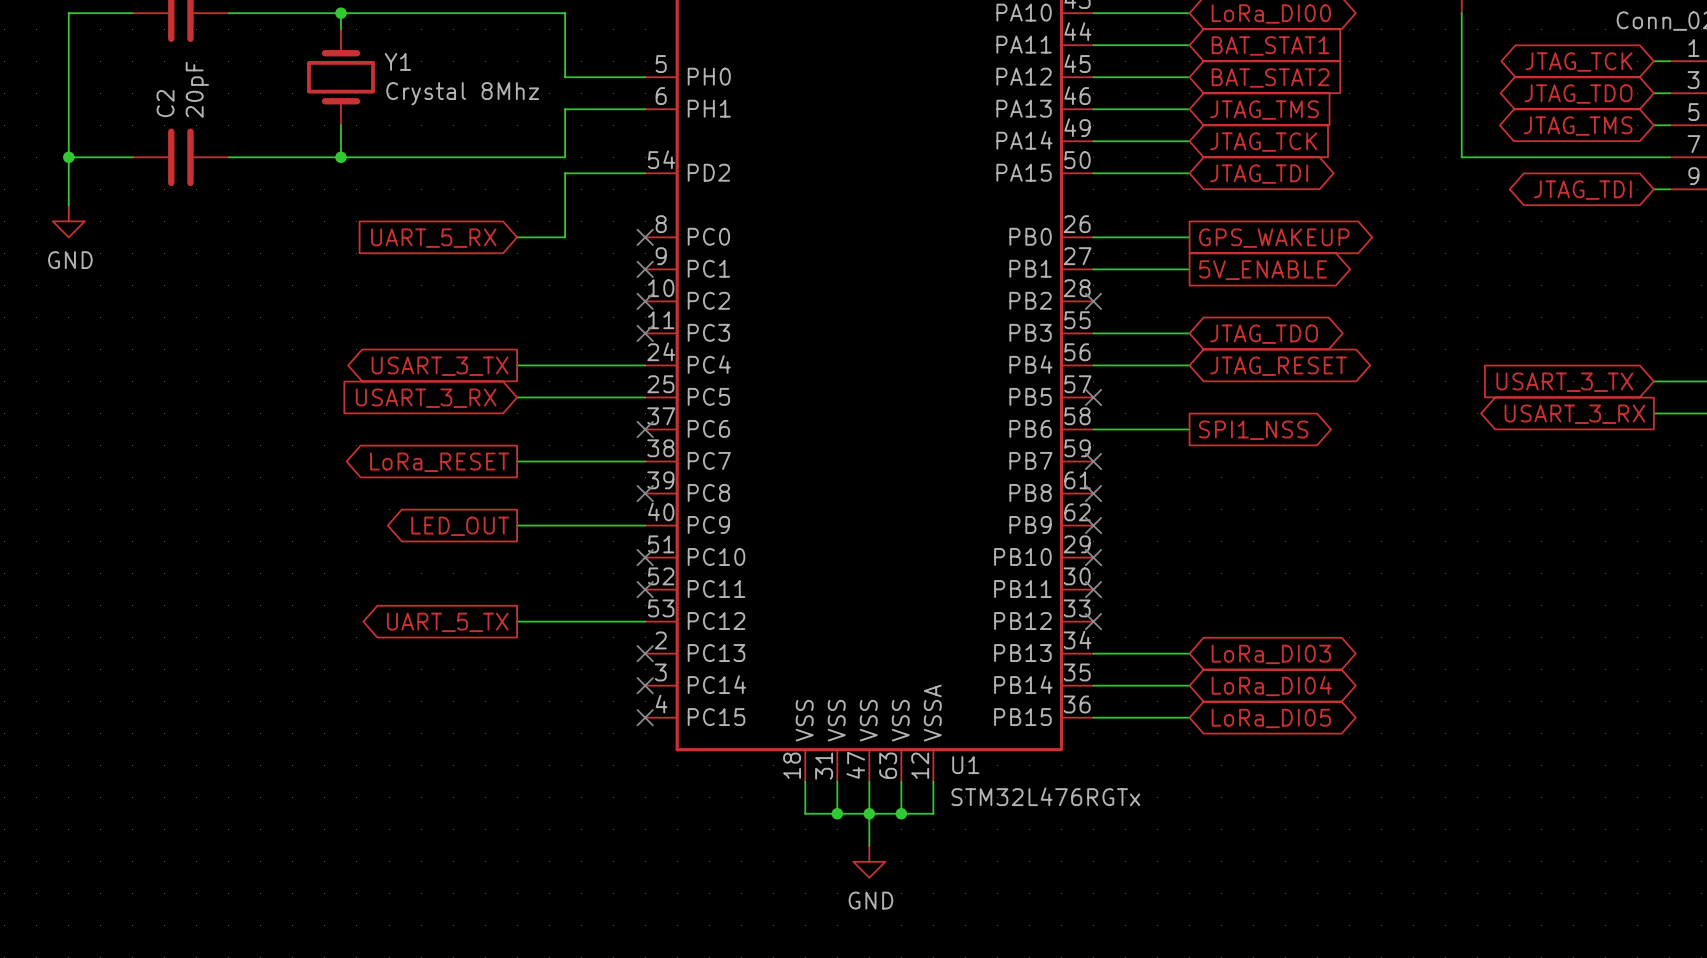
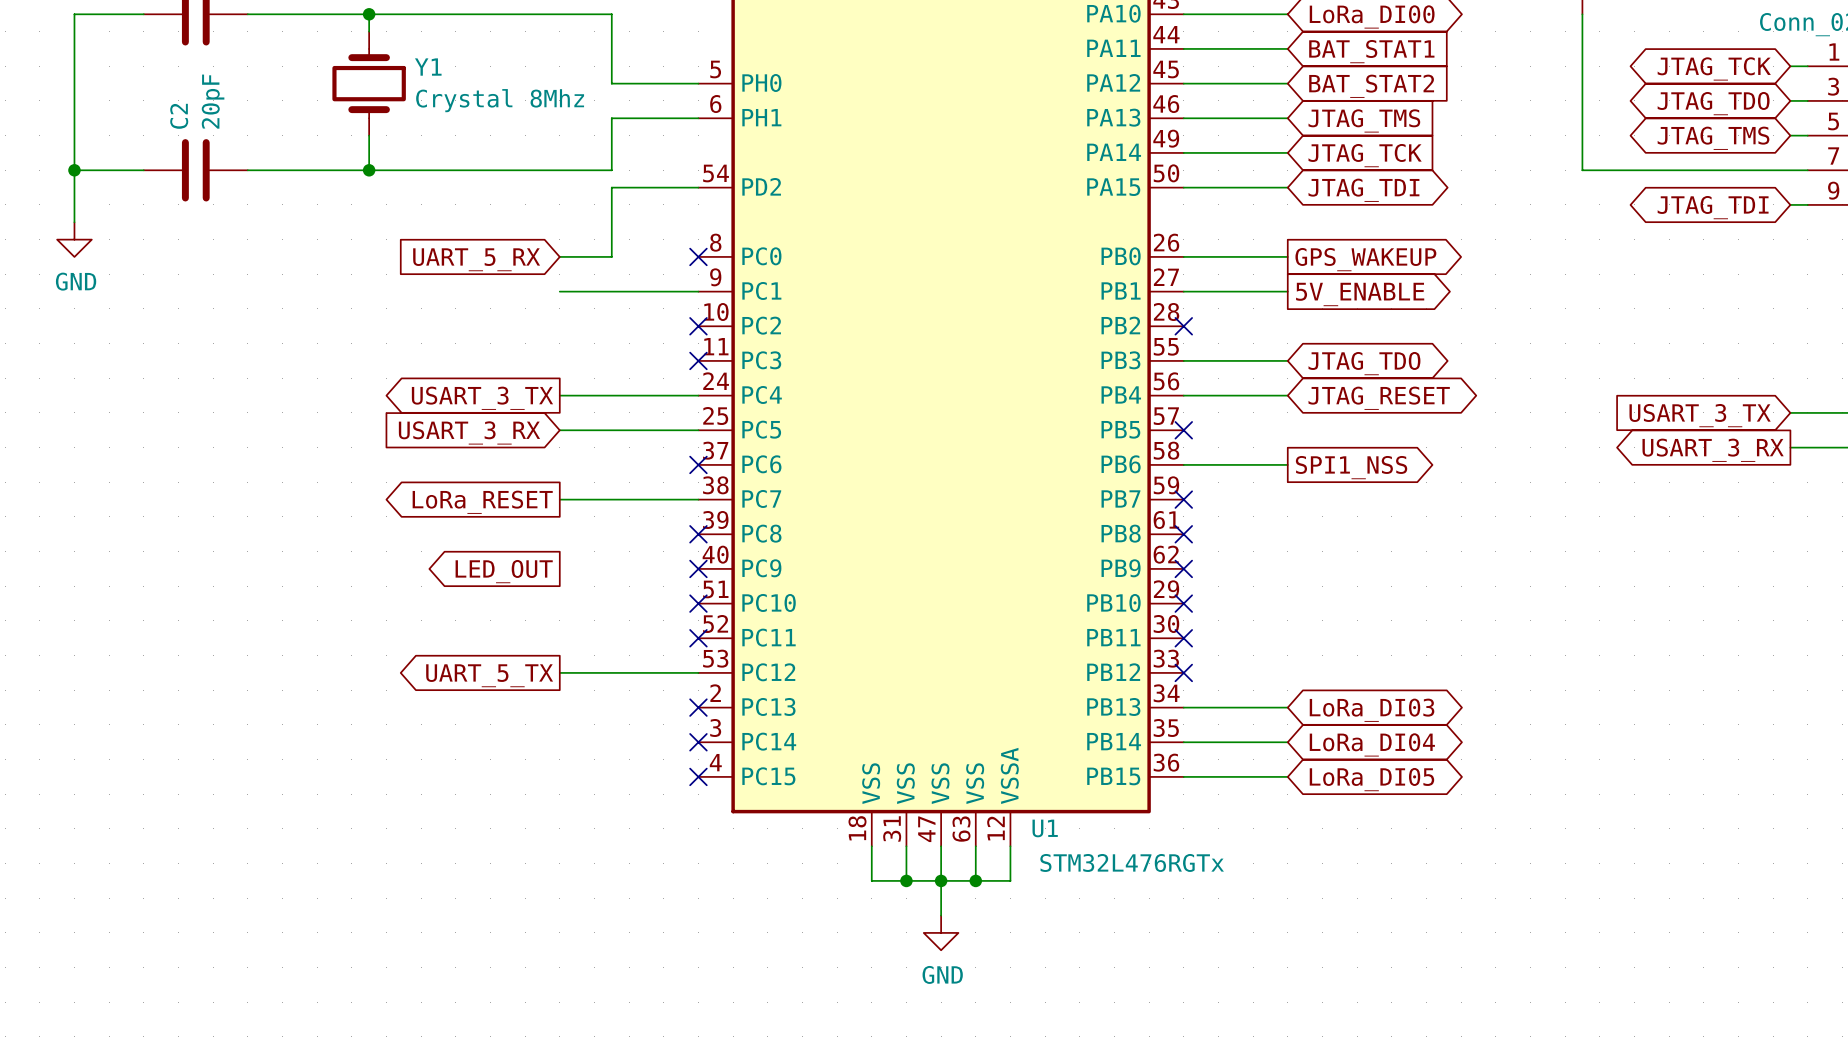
no-connect mark: (645, 269) -> none
wire: (517, 525) (645, 525) -> (559, 291) (698, 291)
no-connect mark: none -> (698, 568)

